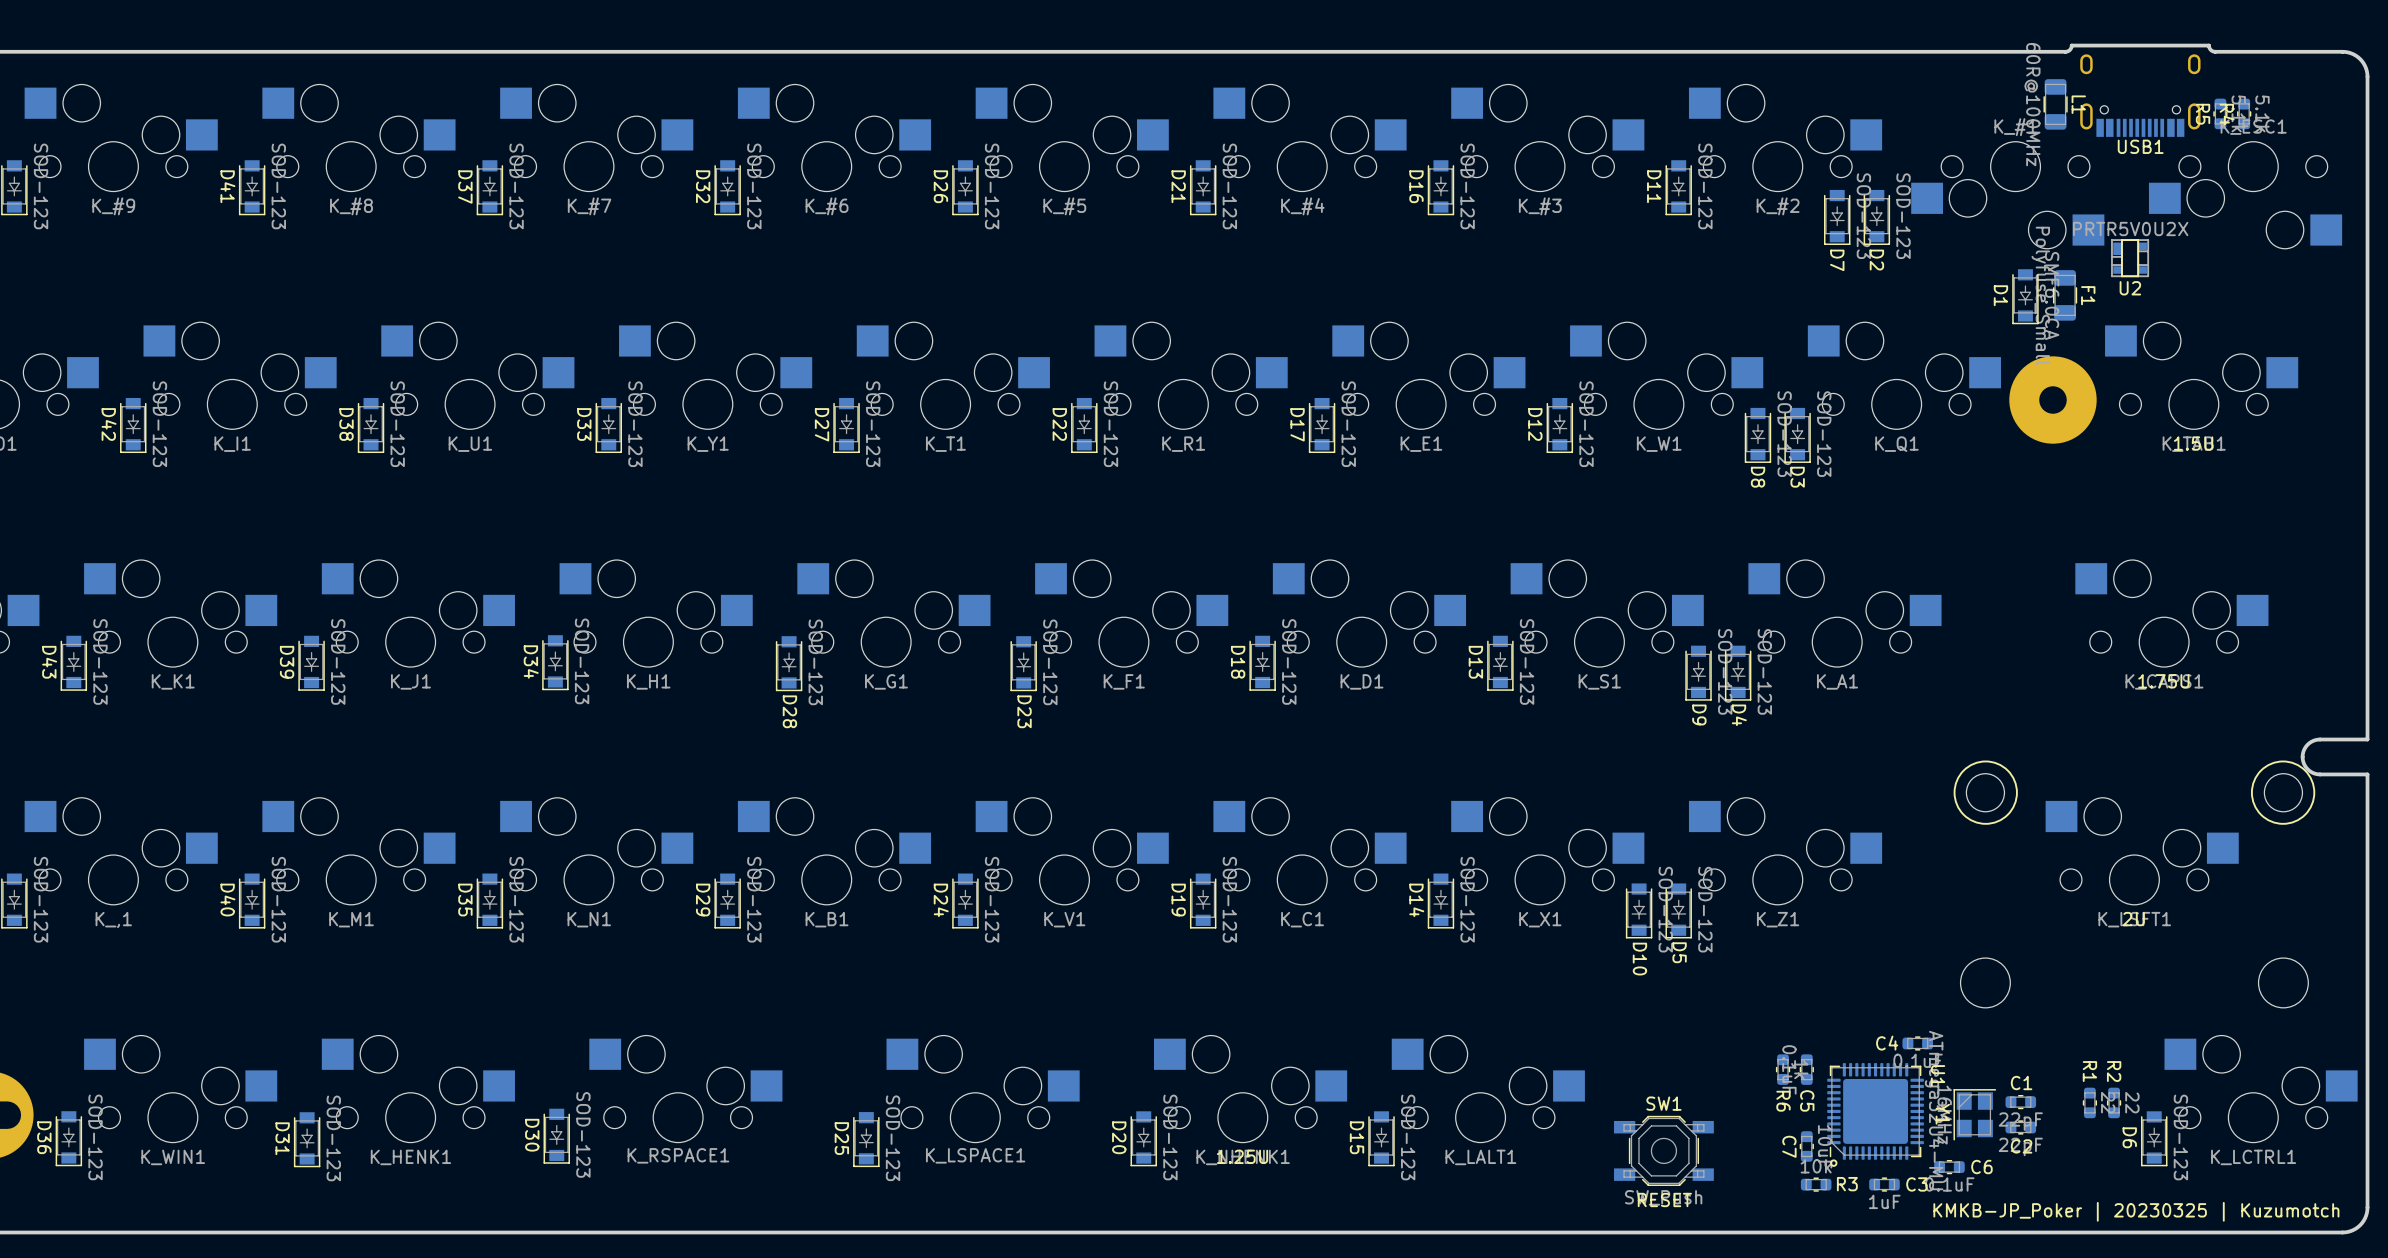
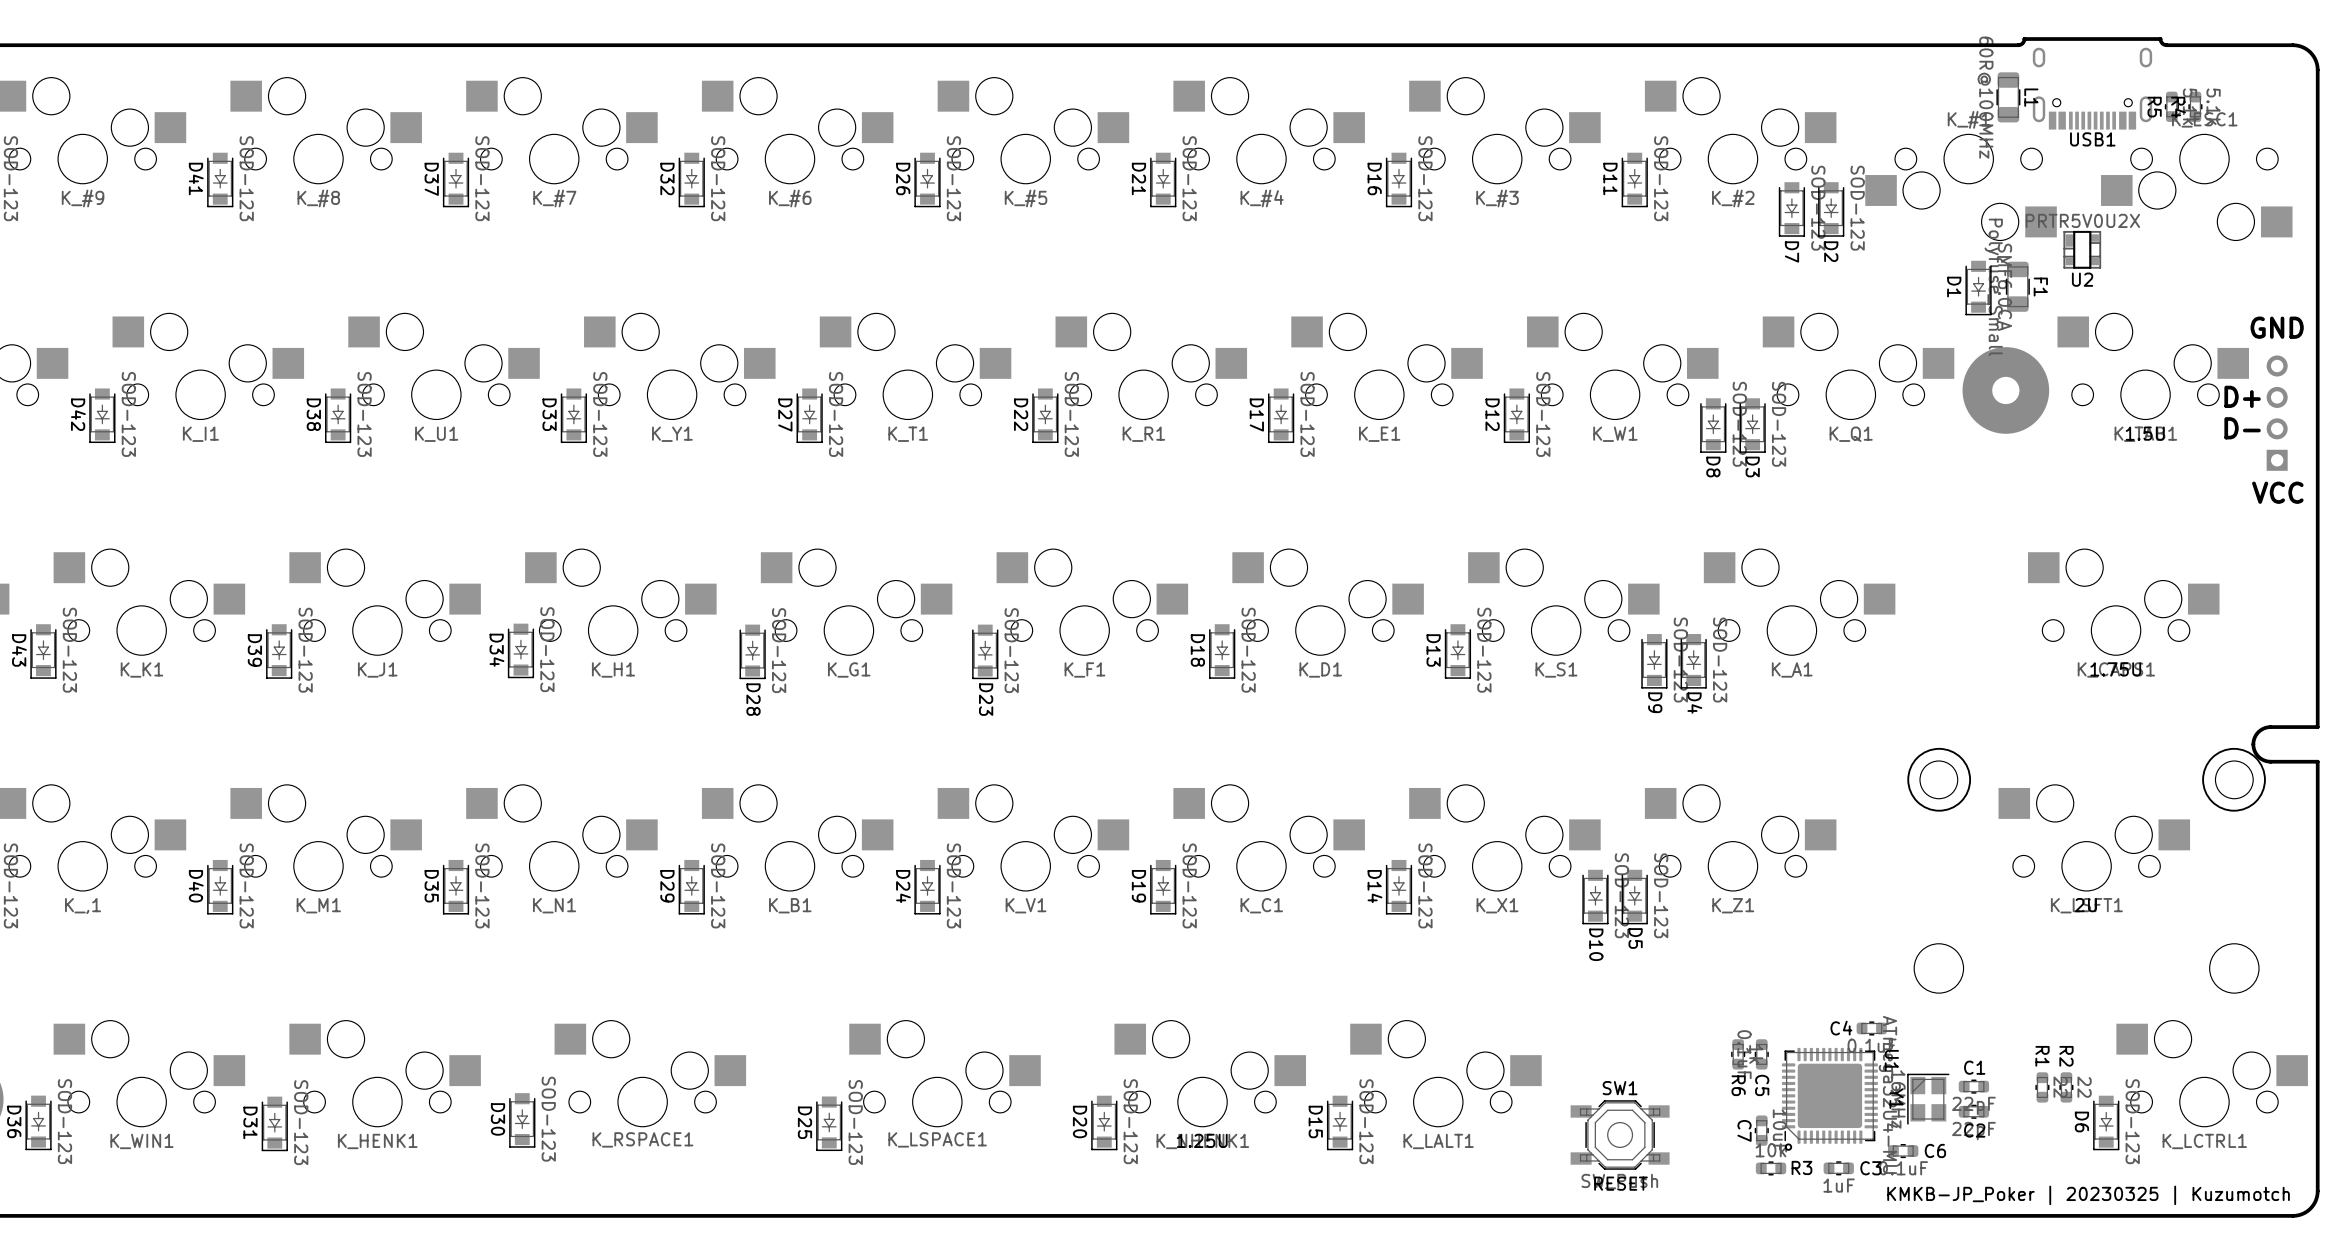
text: none -> GND (2277, 327)
text: none -> D+ (2242, 396)
part: none -> (2277, 413)
text: none -> D- (2242, 428)
text: none -> VCC (2277, 492)

